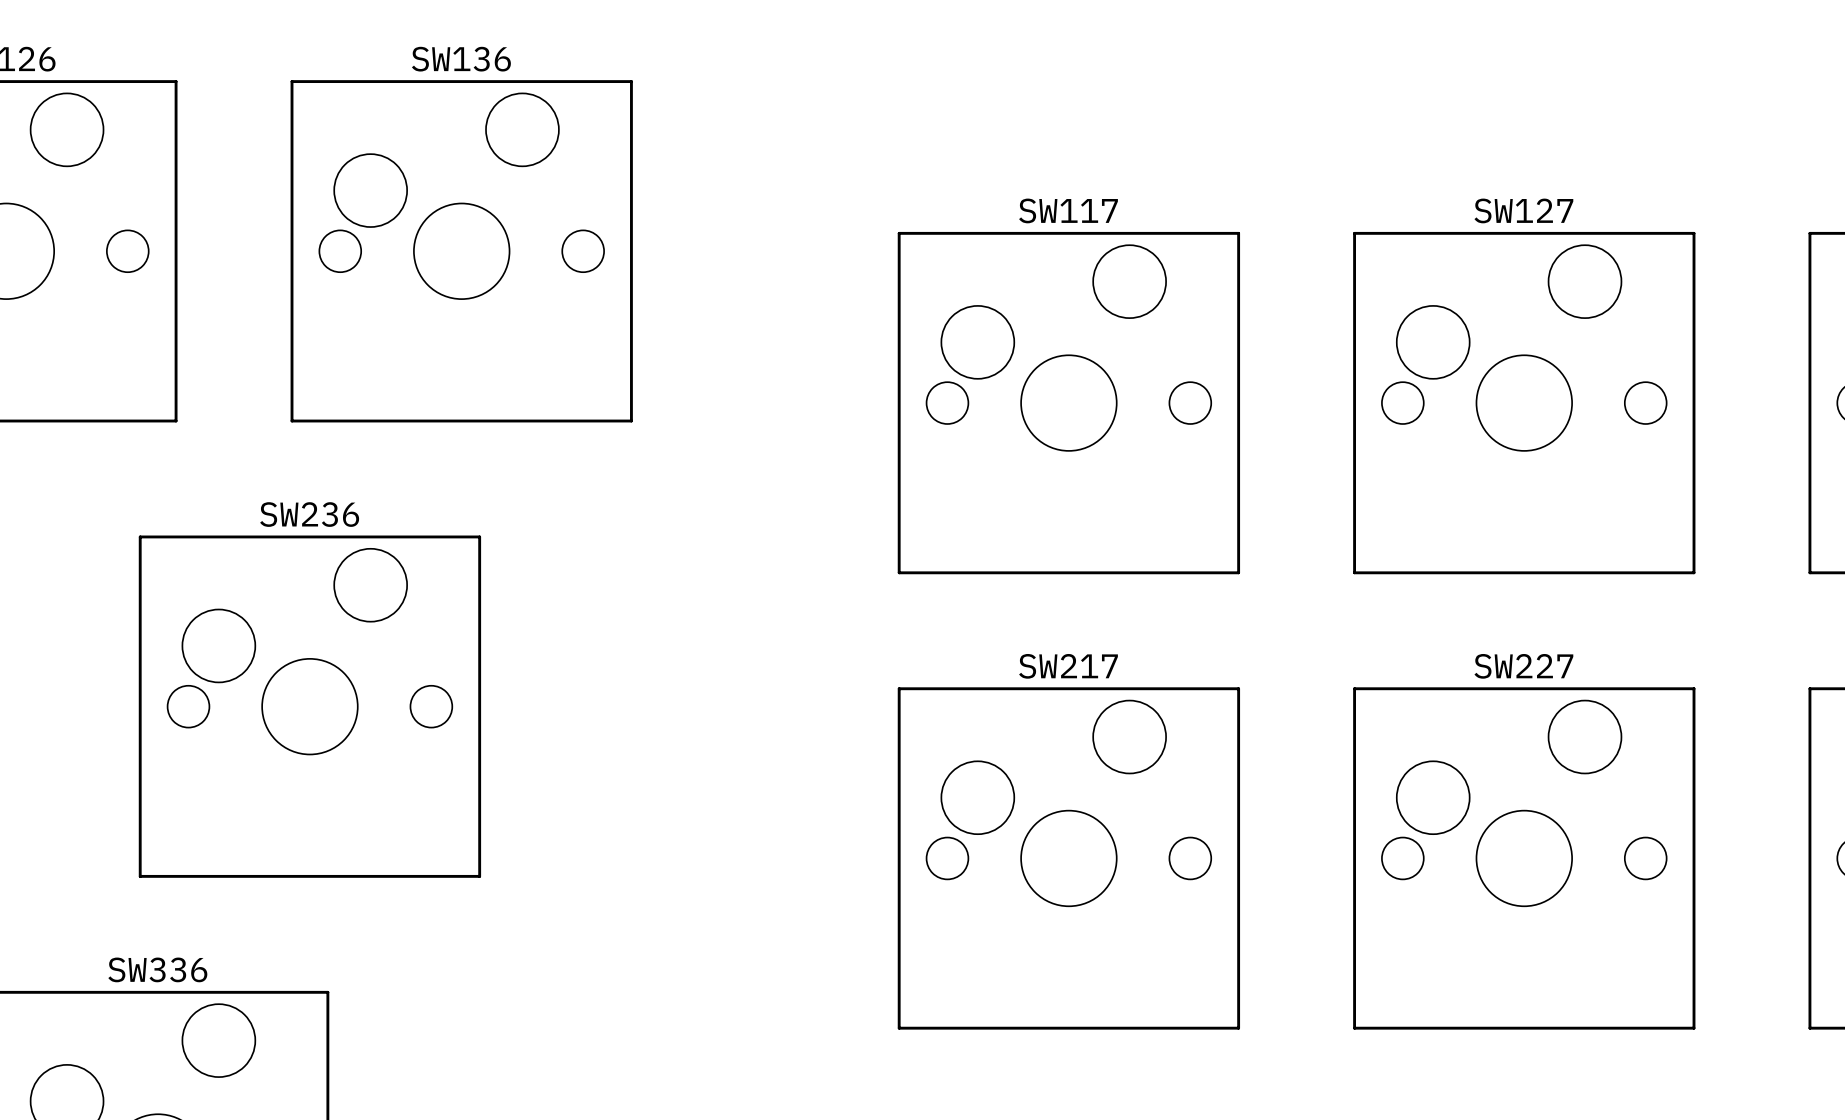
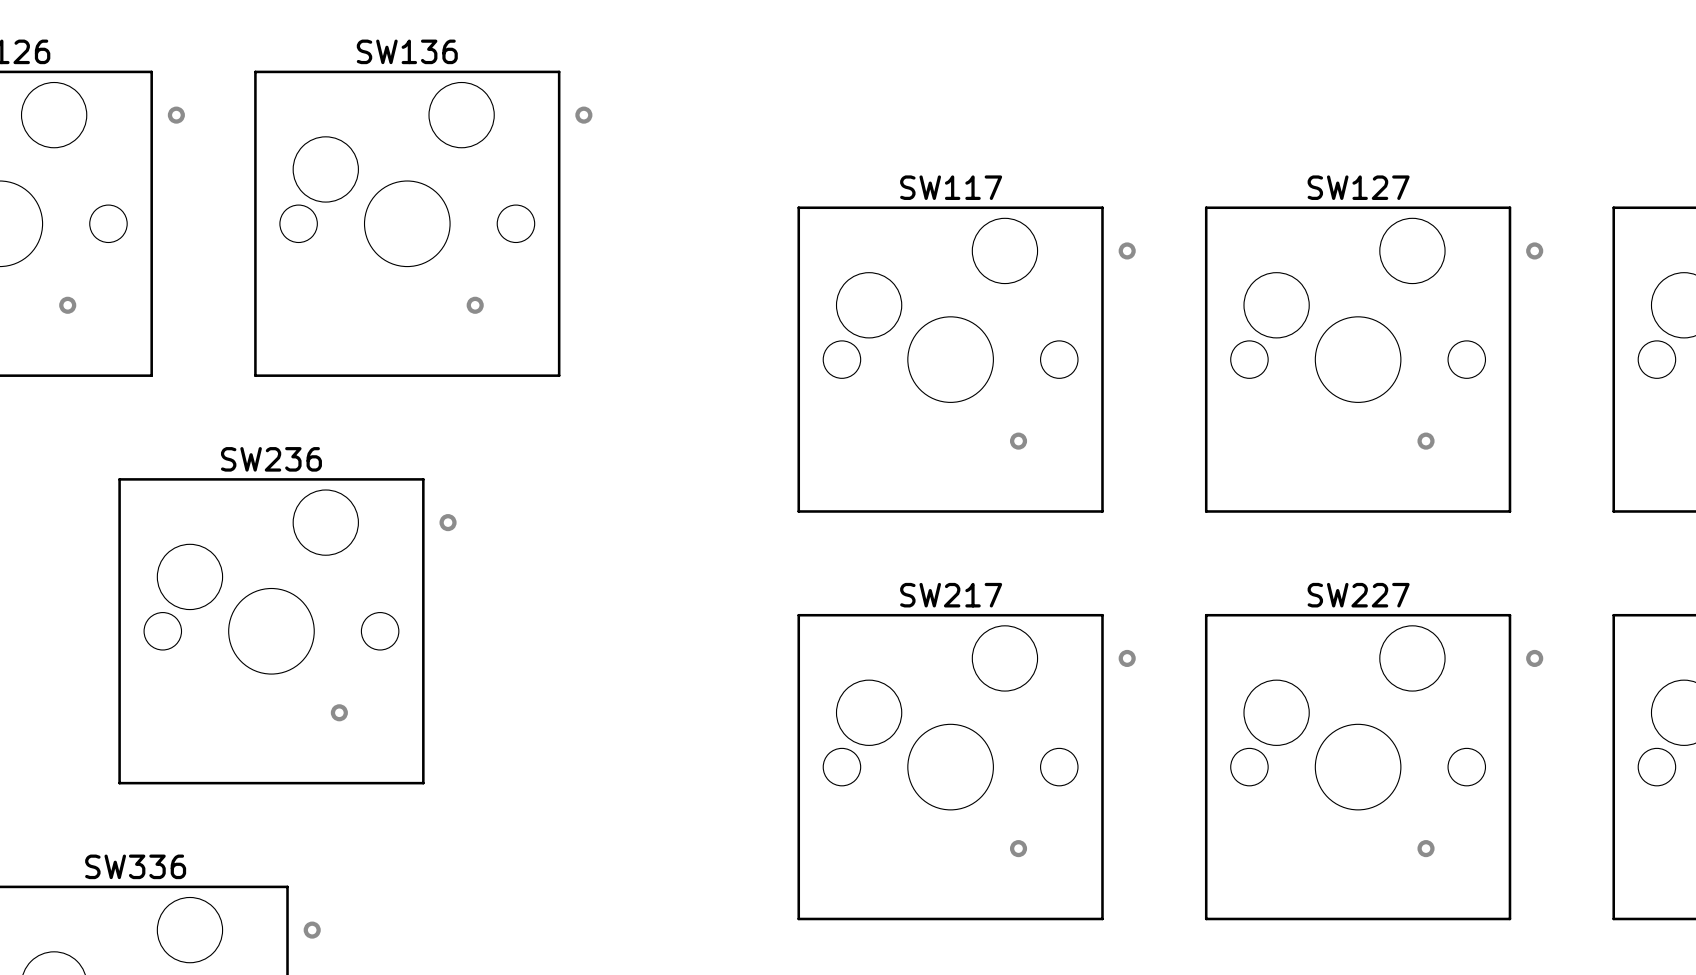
via: none -> (176, 115)
via: none -> (583, 115)
via: none -> (1127, 250)
via: none -> (1534, 250)
via: none -> (67, 305)
via: none -> (475, 305)
via: none -> (1018, 441)
via: none -> (1426, 441)
via: none -> (448, 522)
via: none -> (1127, 658)
via: none -> (1534, 658)
via: none -> (339, 712)
via: none -> (1018, 848)
via: none -> (1426, 848)
via: none -> (312, 930)

